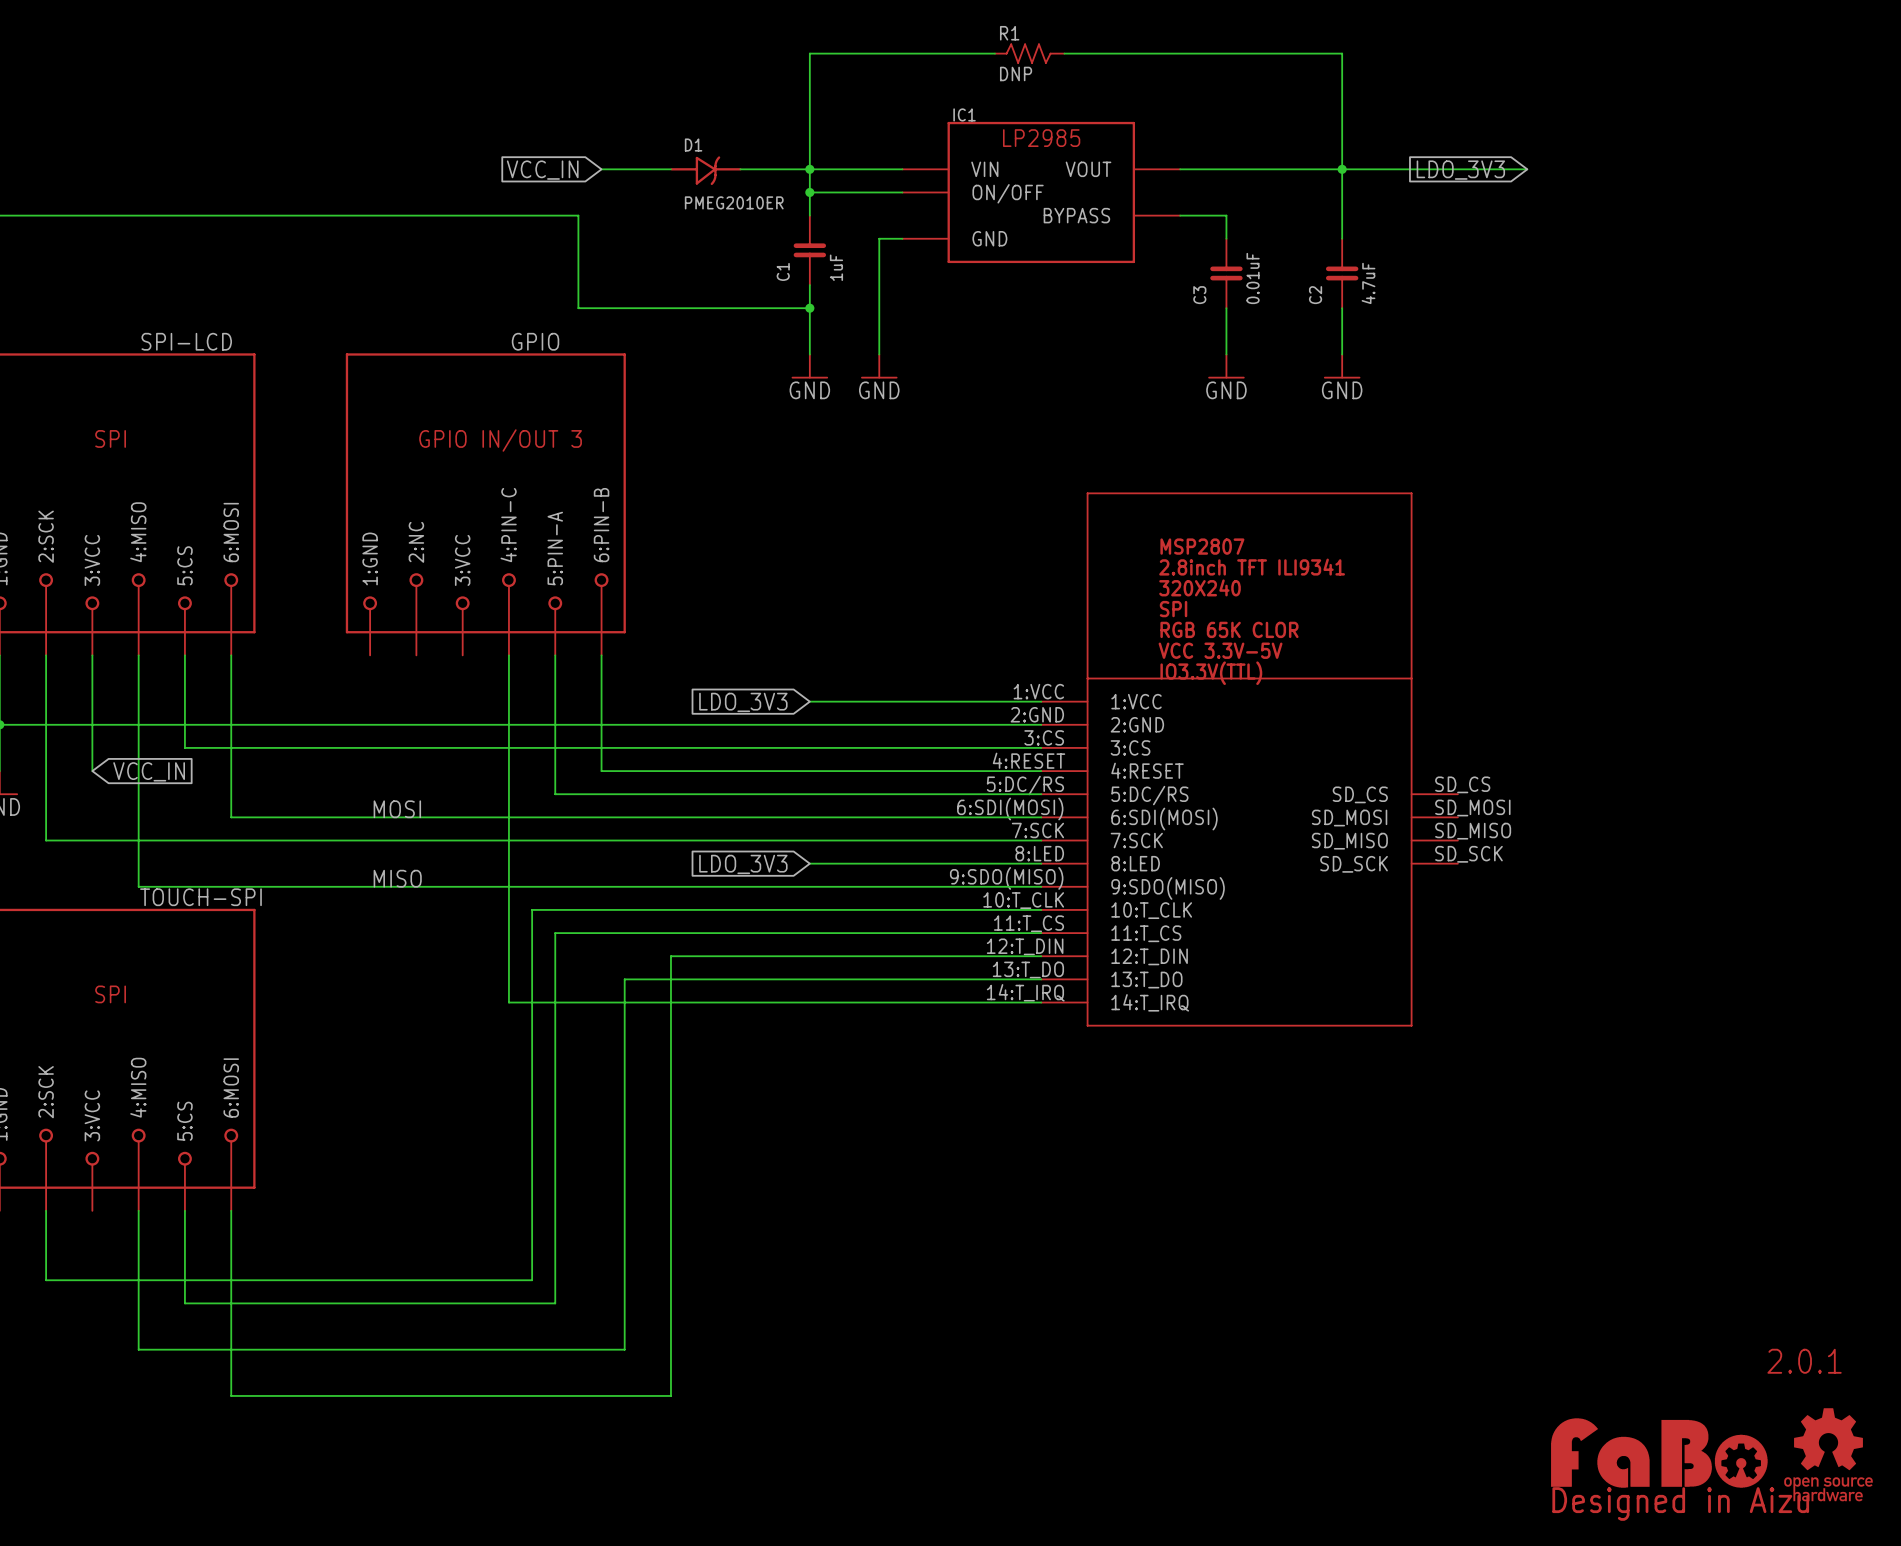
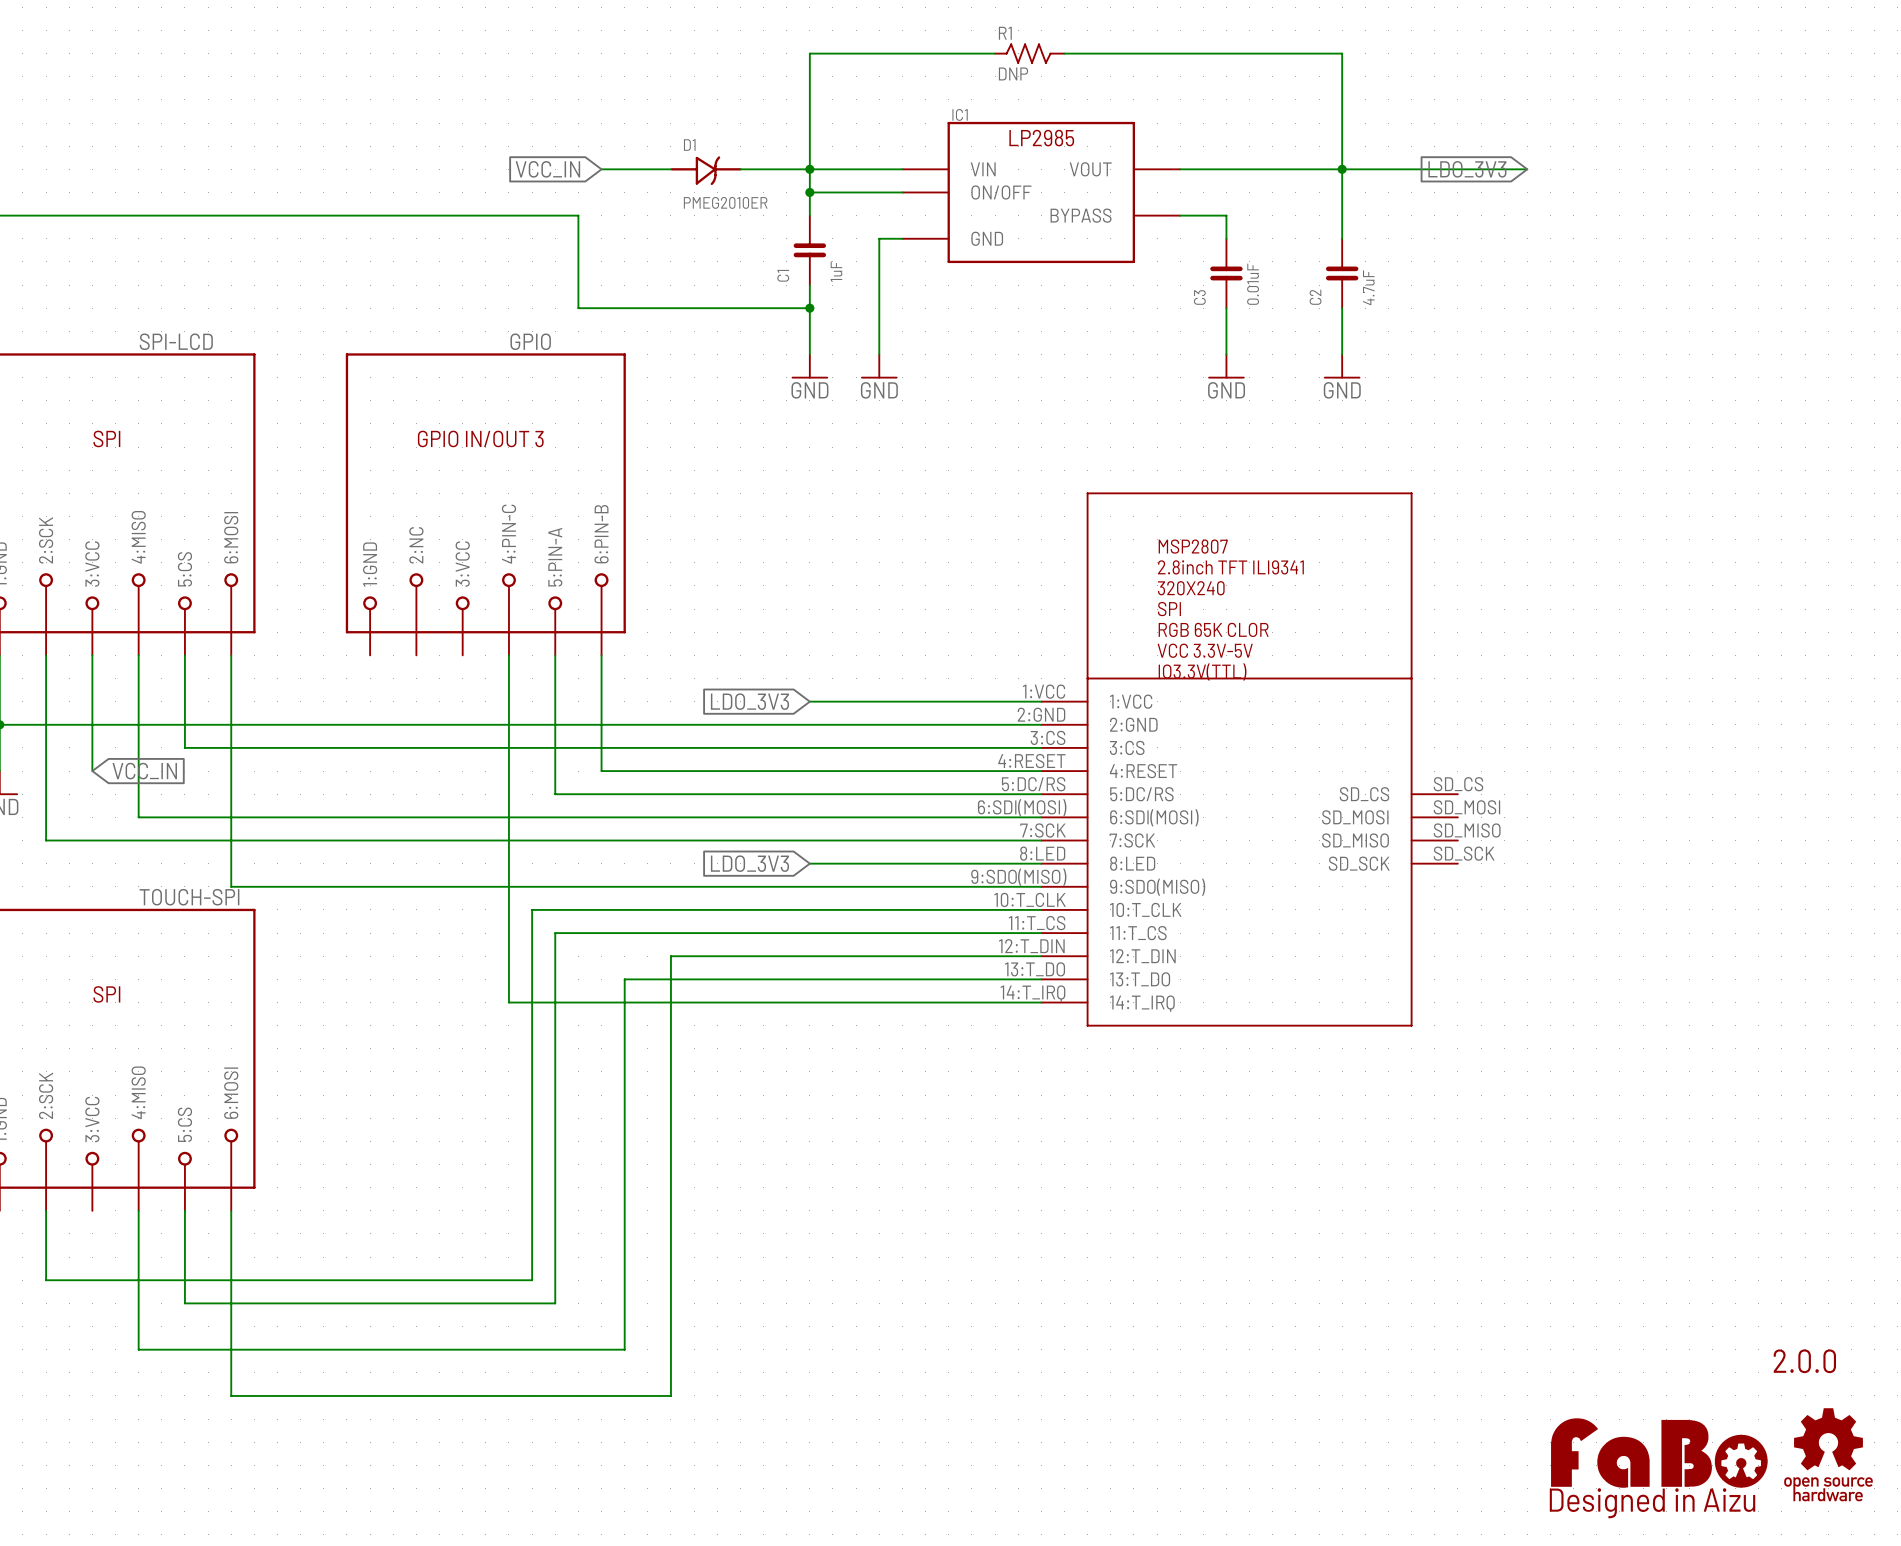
label: MOSI (397, 809) -> none
wire: (138, 817) (138, 886) (231, 886) -> (138, 817) (231, 817) (231, 886)
label: MISO (397, 878) -> none
text: 2.0.1 (1804, 1361) -> 2.0.0 (1804, 1361)

